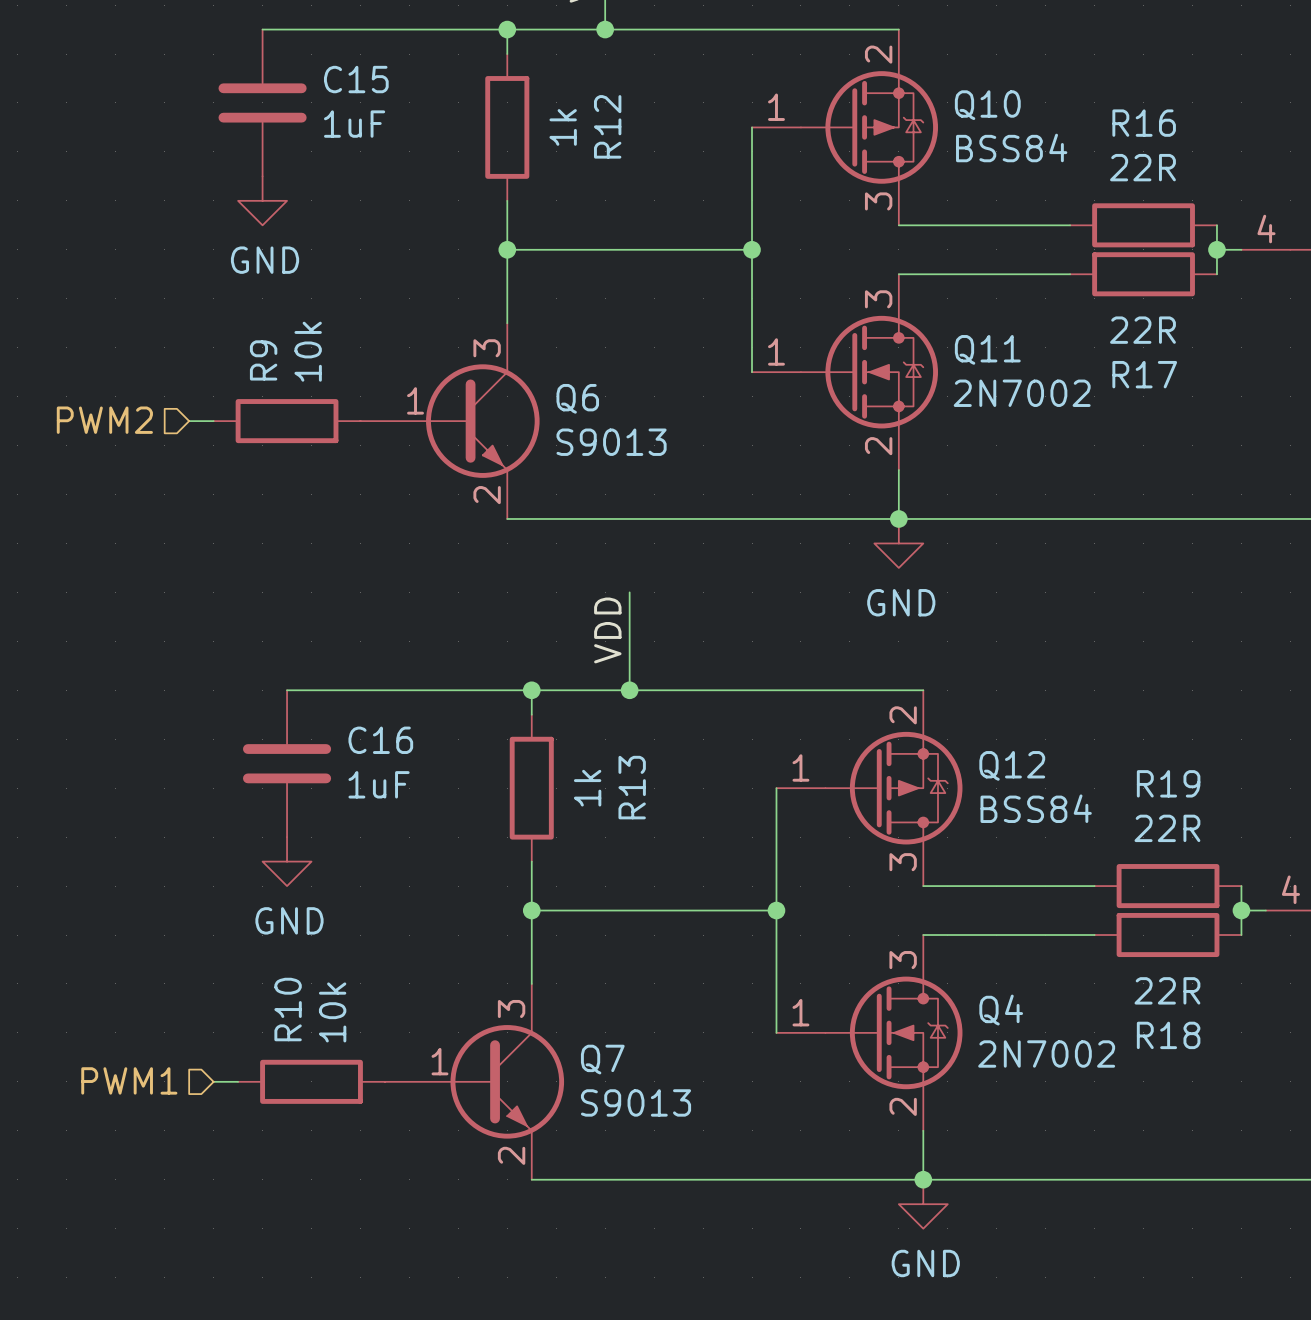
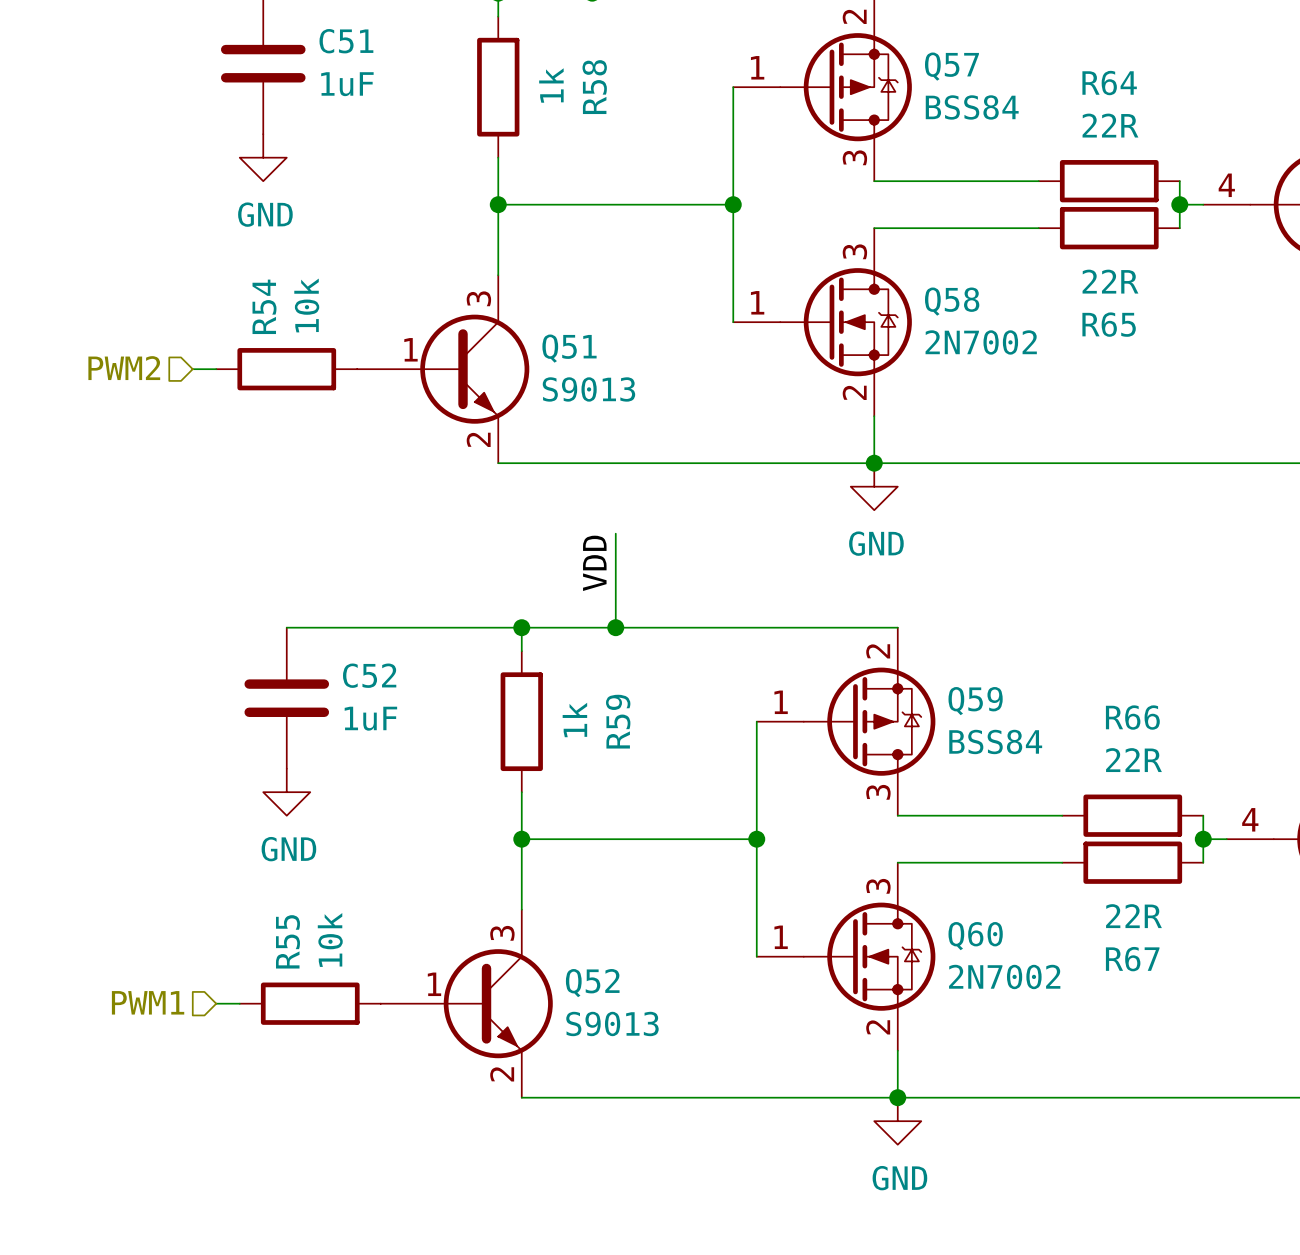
C15 name: C15 (356, 79) -> C51 (346, 41)
Q10 name: Q10 (987, 105) -> Q57 (951, 66)
R16 name: R16 (1144, 123) -> R64 (1109, 83)
R12 name: R12 (607, 126) -> R58 (594, 87)
Q11 name: Q11 (987, 349) -> Q58 (952, 301)
R9 name: R9 (263, 360) -> R54 (264, 306)
R17 name: R17 (1144, 374) -> R65 (1109, 324)
Q6 name: Q6 (577, 398) -> Q51 (569, 348)
C16 name: C16 (380, 740) -> C52 (369, 675)
Q12 name: Q12 (1012, 765) -> Q59 (975, 701)
R19 name: R19 (1168, 783) -> R66 (1132, 717)
R13 name: R13 (632, 787) -> R59 (618, 721)
R10 name: R10 (288, 1009) -> R55 (287, 941)
Q4 name: Q4 (1001, 1010) -> Q60 (975, 936)
R18 name: R18 (1168, 1035) -> R67 (1132, 959)
Q7 name: Q7 (602, 1059) -> Q52 (592, 983)

